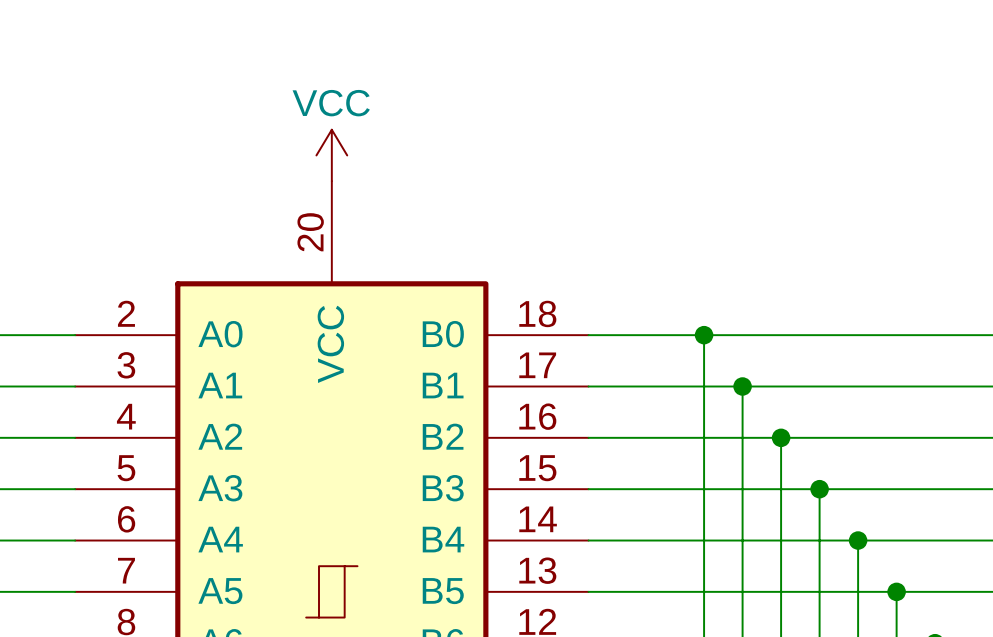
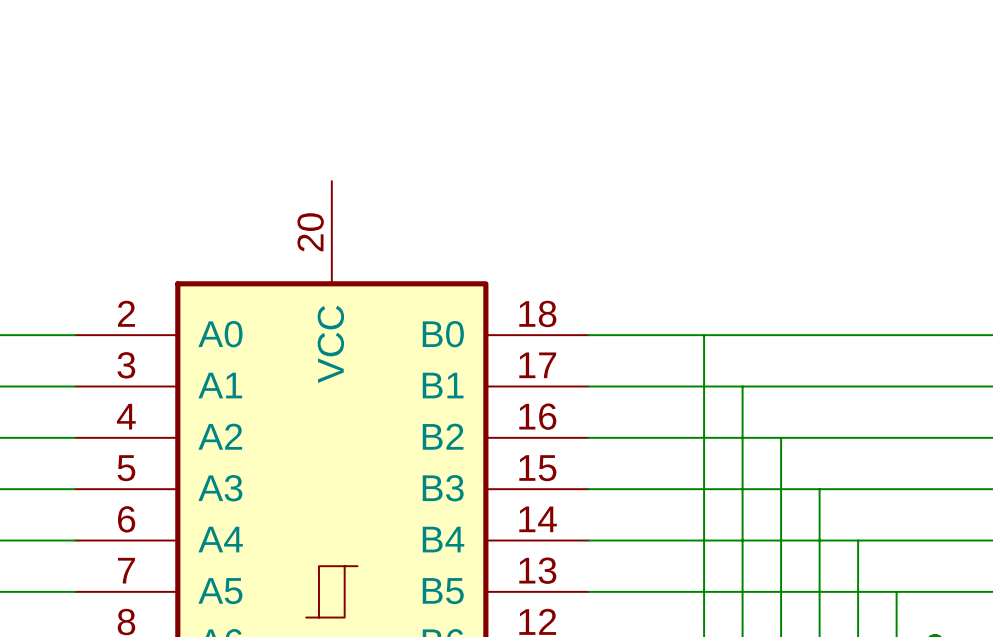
power symbol: VCC (331, 155) -> none
junction: (704, 335) -> none
junction: (742, 386) -> none
junction: (781, 437) -> none
junction: (819, 489) -> none
junction: (858, 540) -> none
junction: (896, 591) -> none

